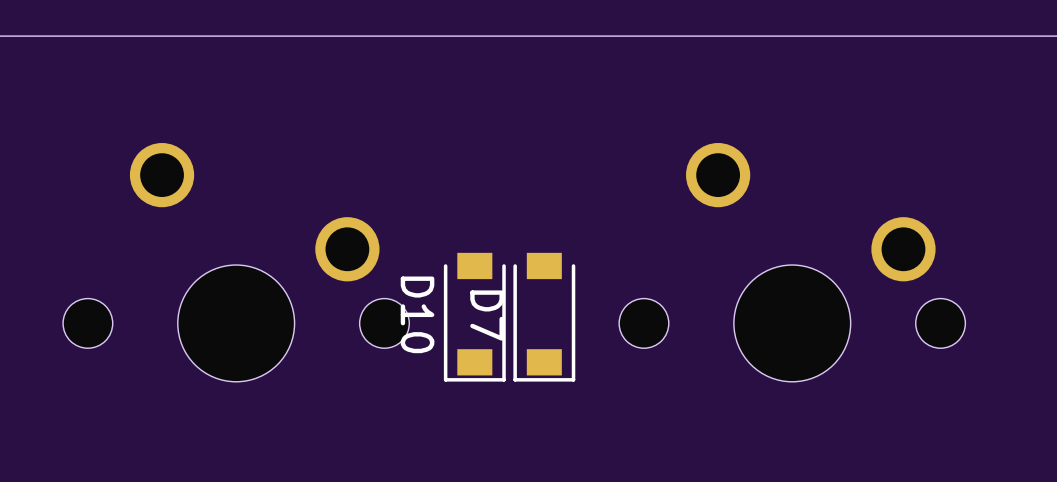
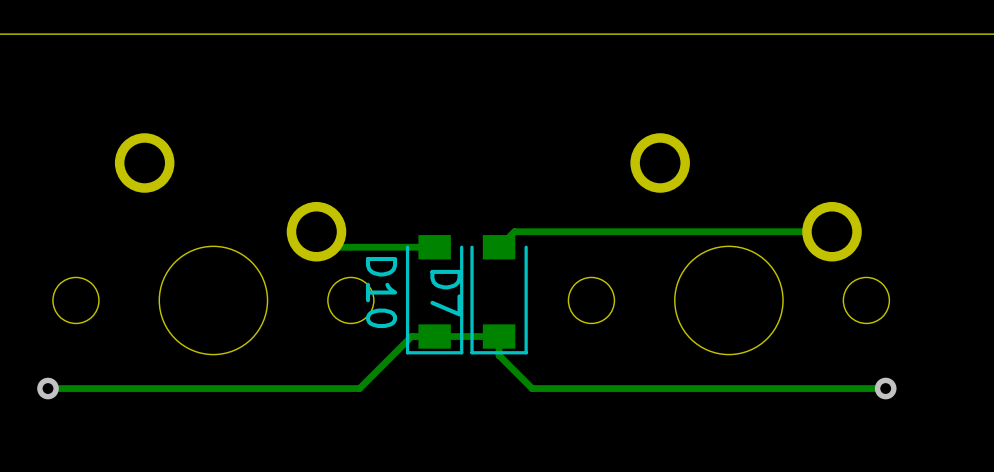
track: none -> (316, 231) (332, 247) (434, 247)
track: none -> (832, 231) (514, 231) (499, 247)
via: none -> (48, 388)
track: none -> (885, 388) (532, 388) (499, 355) (499, 336) (411, 336) (359, 388) (48, 388)
via: none -> (885, 388)

